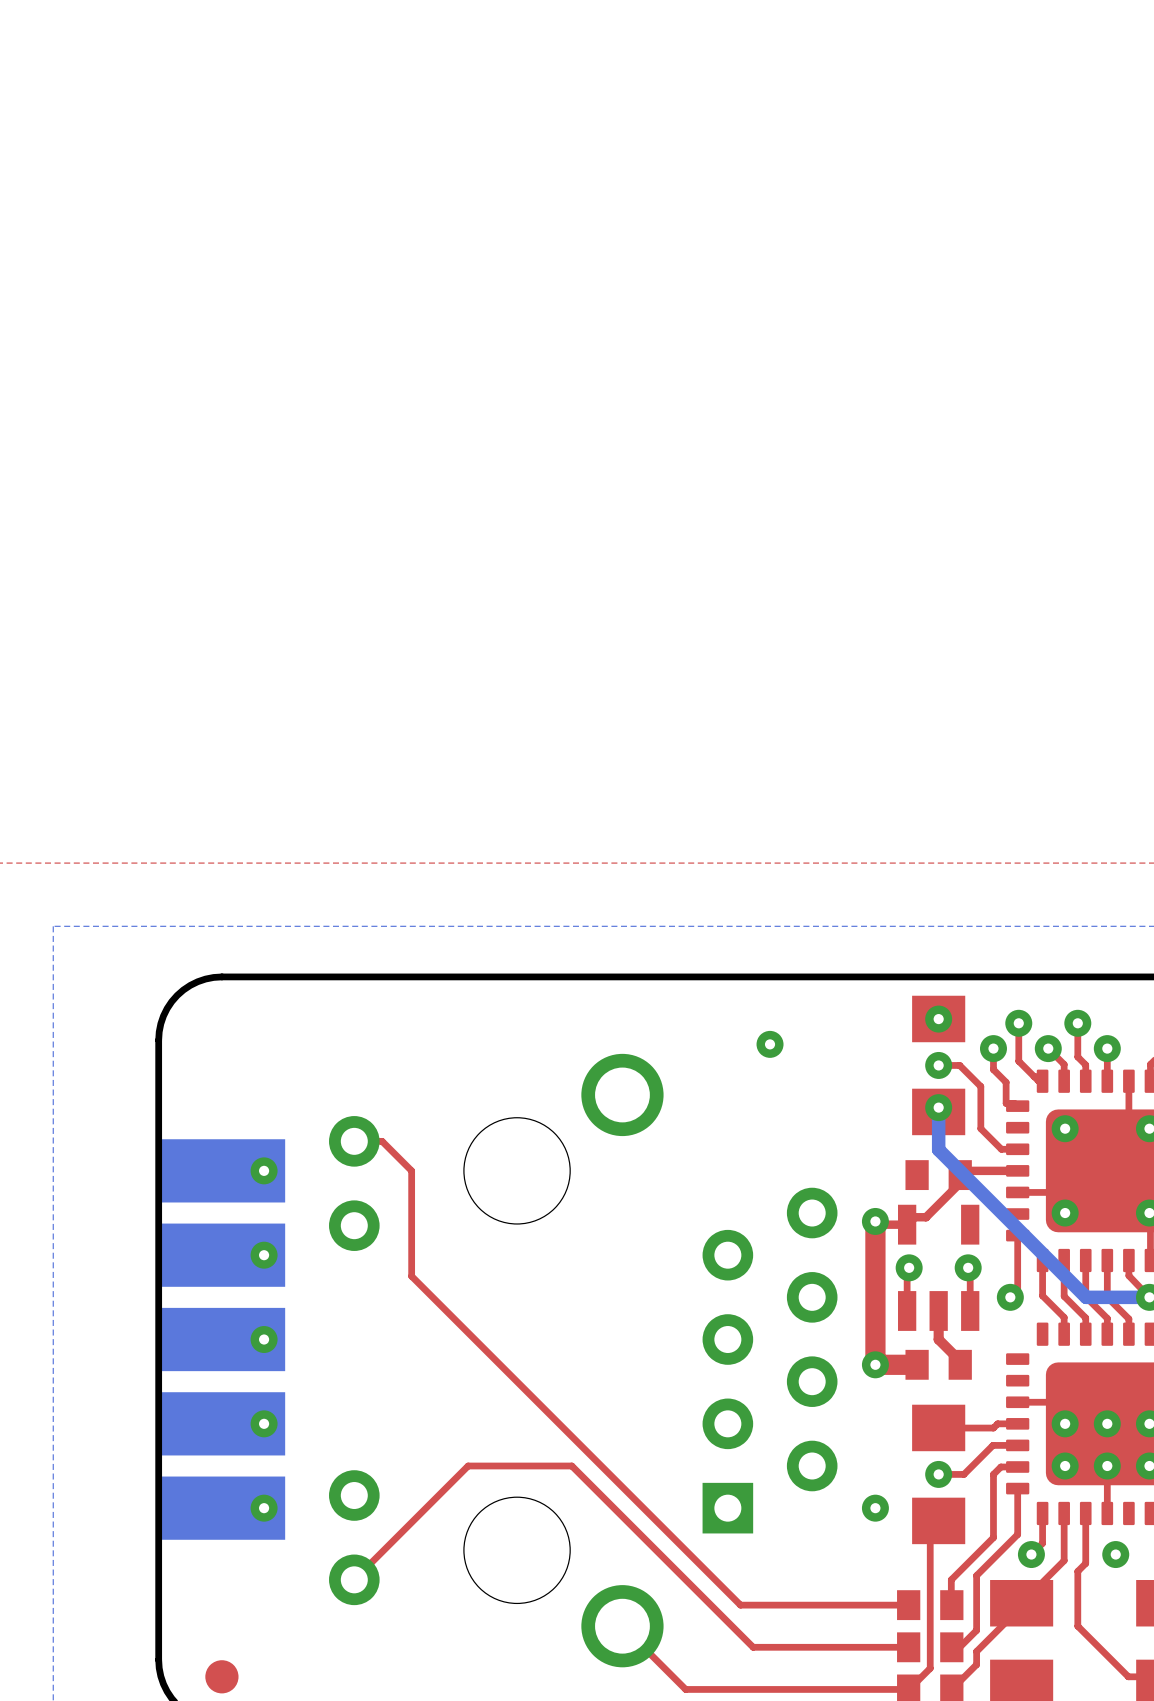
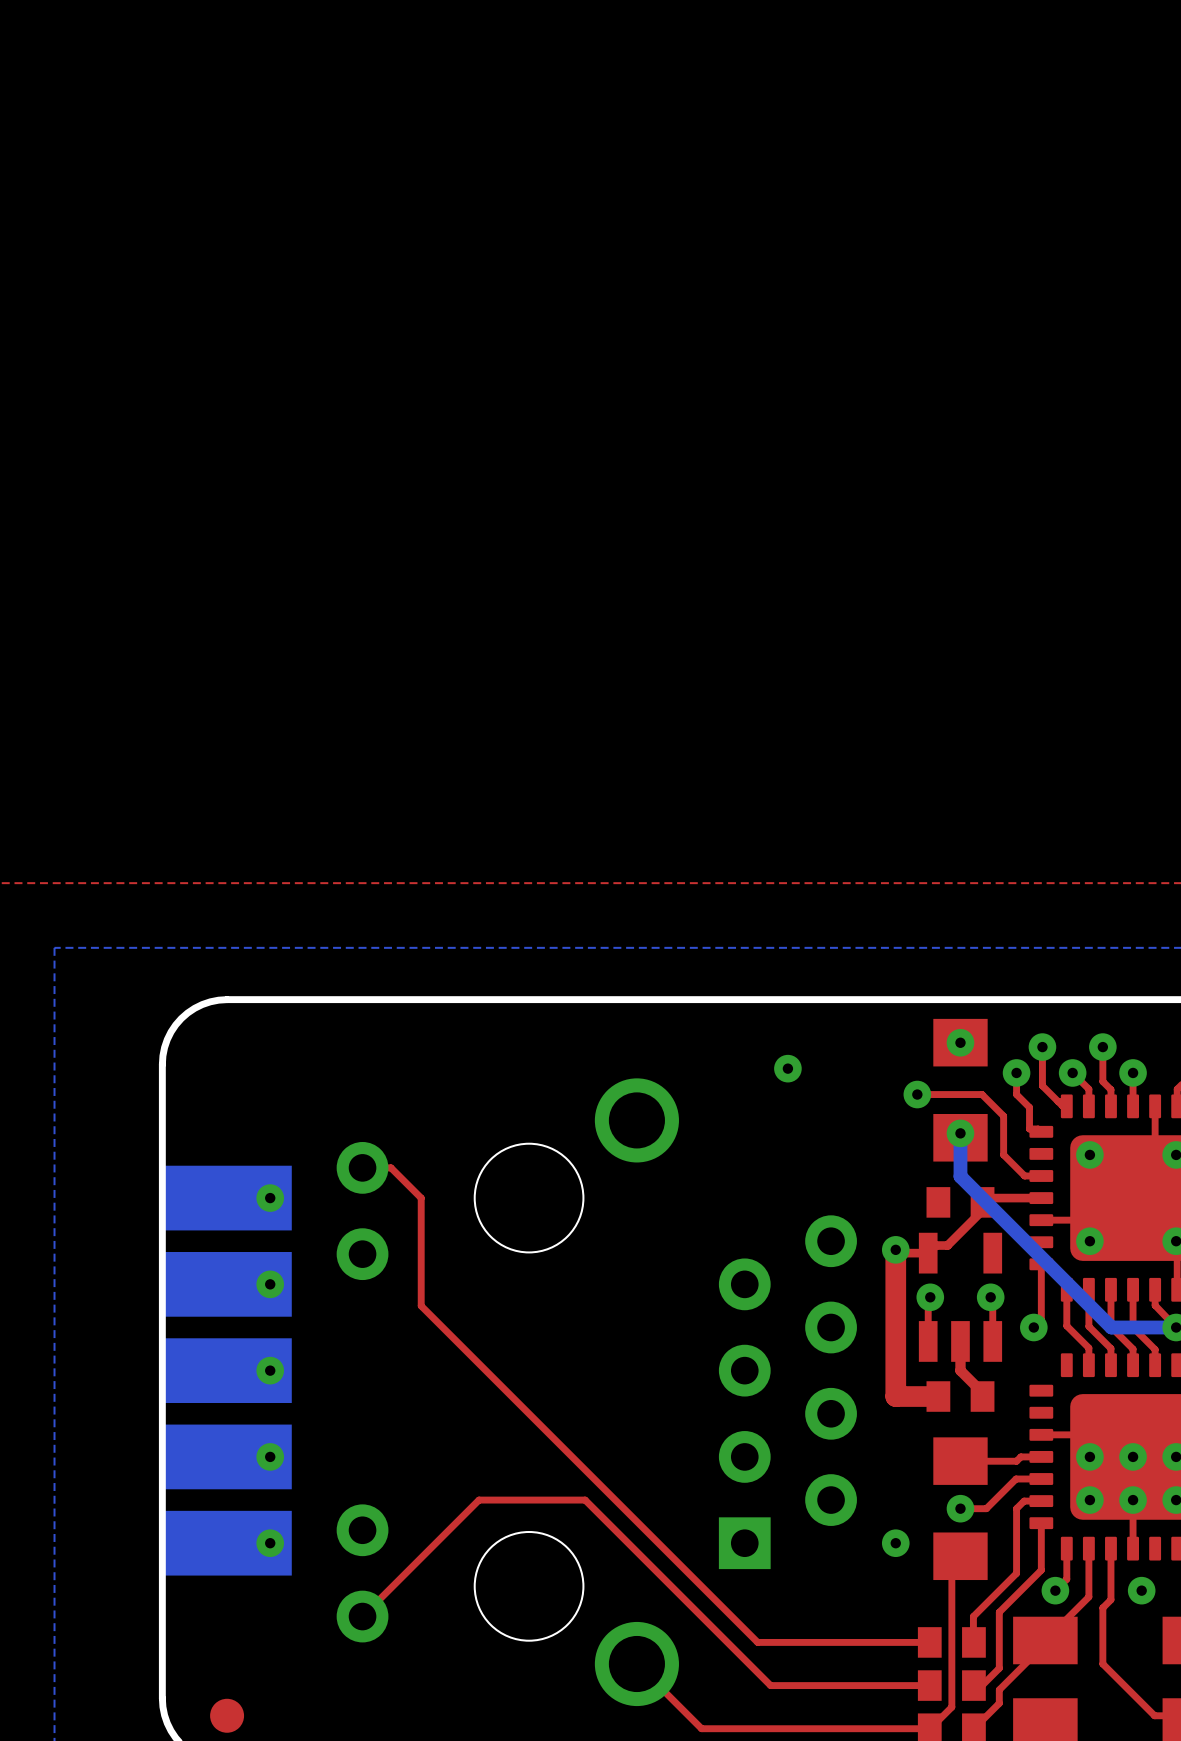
top track: (938, 1065) (959, 1065) (980, 1086) (980, 1090) -> (917, 1094) (982, 1094) (1003, 1116)
via position: (938, 1065) -> (917, 1094)
via: (875, 1364) -> none

